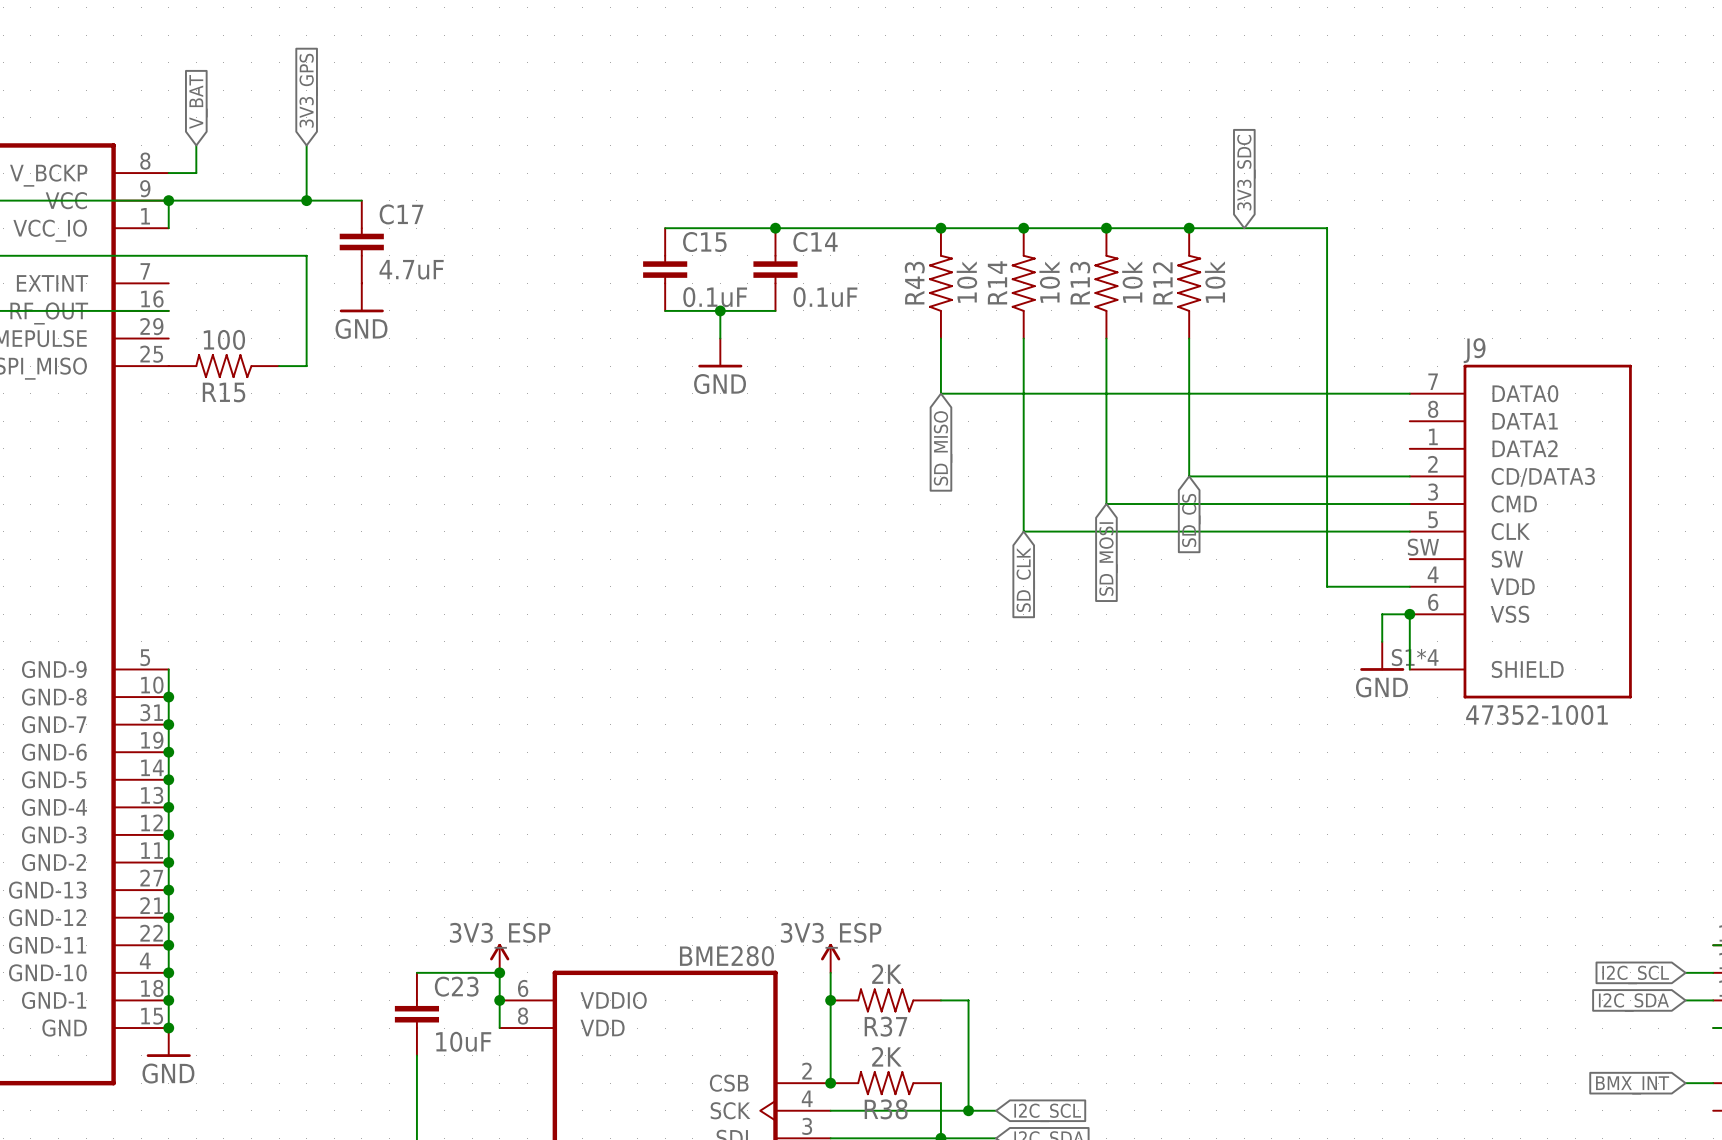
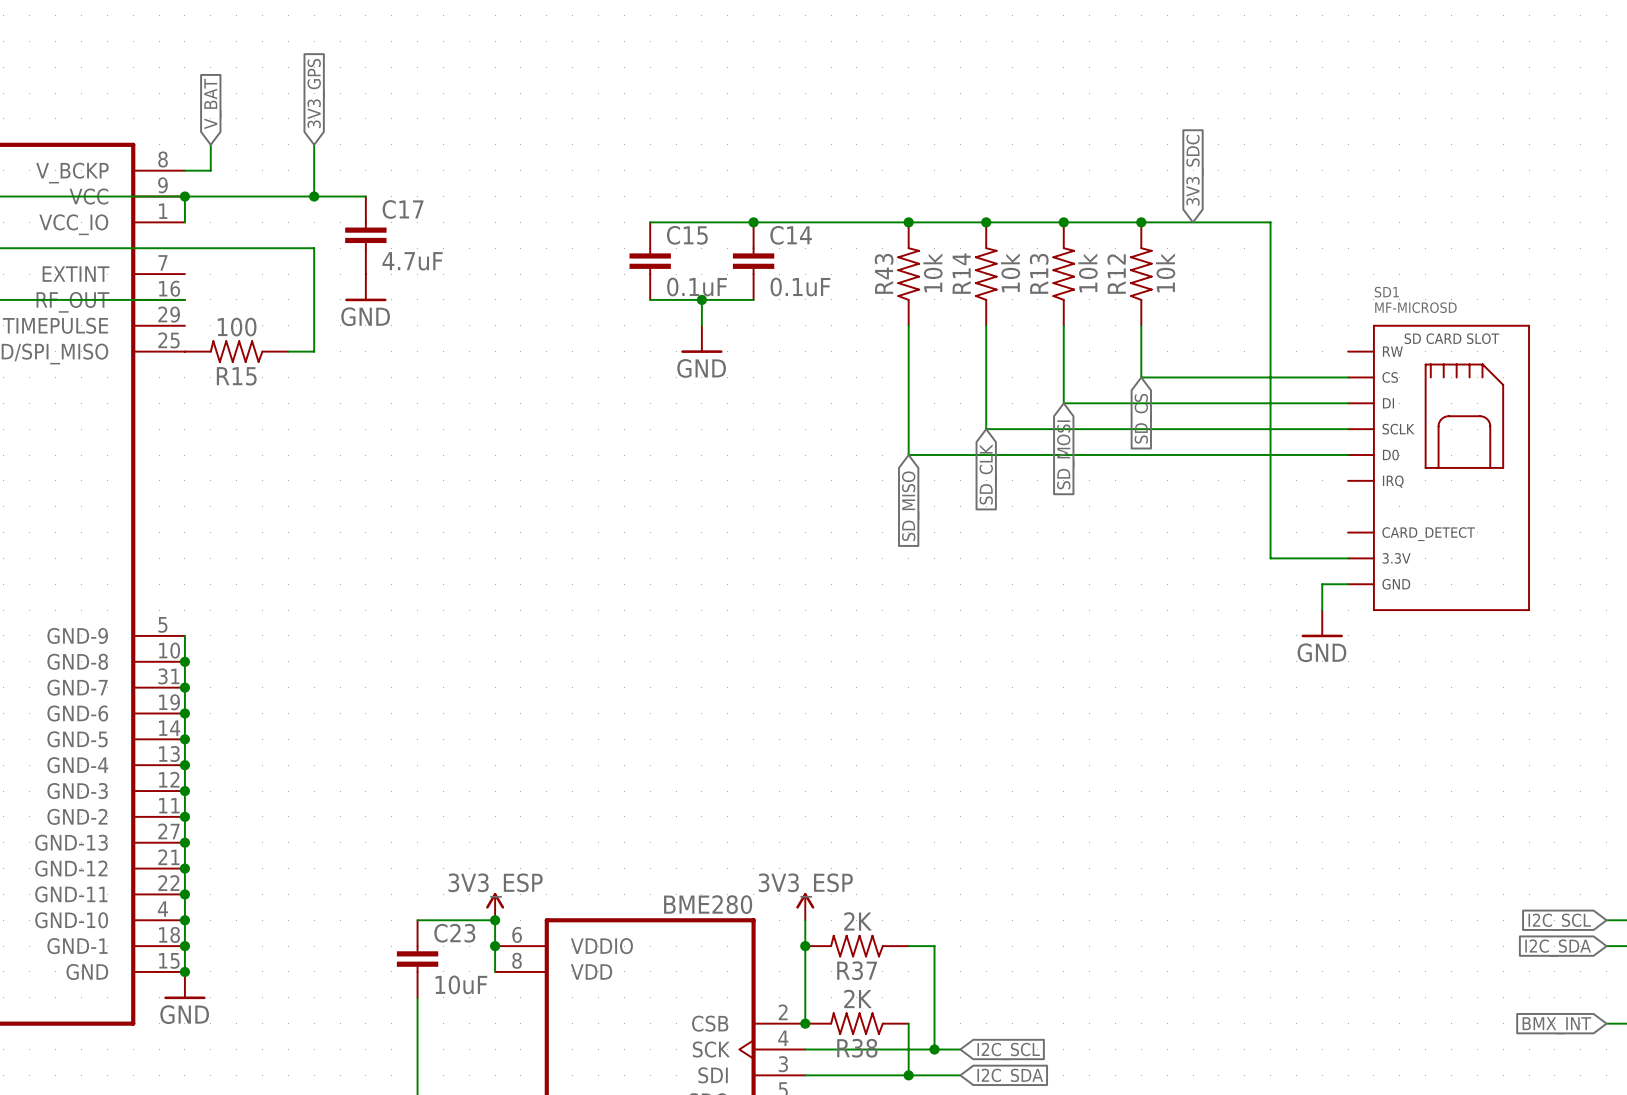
wire: (940, 393) (1189, 393) (1189, 476) -> (908, 377) (908, 455) (1141, 455)
wire: (1106, 421) (1106, 504) (1409, 504) -> (1063, 403) (1348, 403)
global label position: SD_MISO (943, 448) -> SD_MISO (910, 506)
wire: (1023, 448) (1023, 531) (1409, 531) -> (986, 429) (1348, 429)
SD1: none -> MF-MICROSD (1438, 467)
global label position: SD_CS (1191, 520) -> SD_CS (1143, 418)
J9: 47352-1001 (1520, 531) -> none
global label position: SD_MOSI (1108, 558) -> SD_MOSI (1065, 454)
global label position: SD_CLK (1025, 579) -> SD_CLK (988, 474)
wire: (1409, 614) (1409, 669) -> none
junction: (1409, 614) -> none

